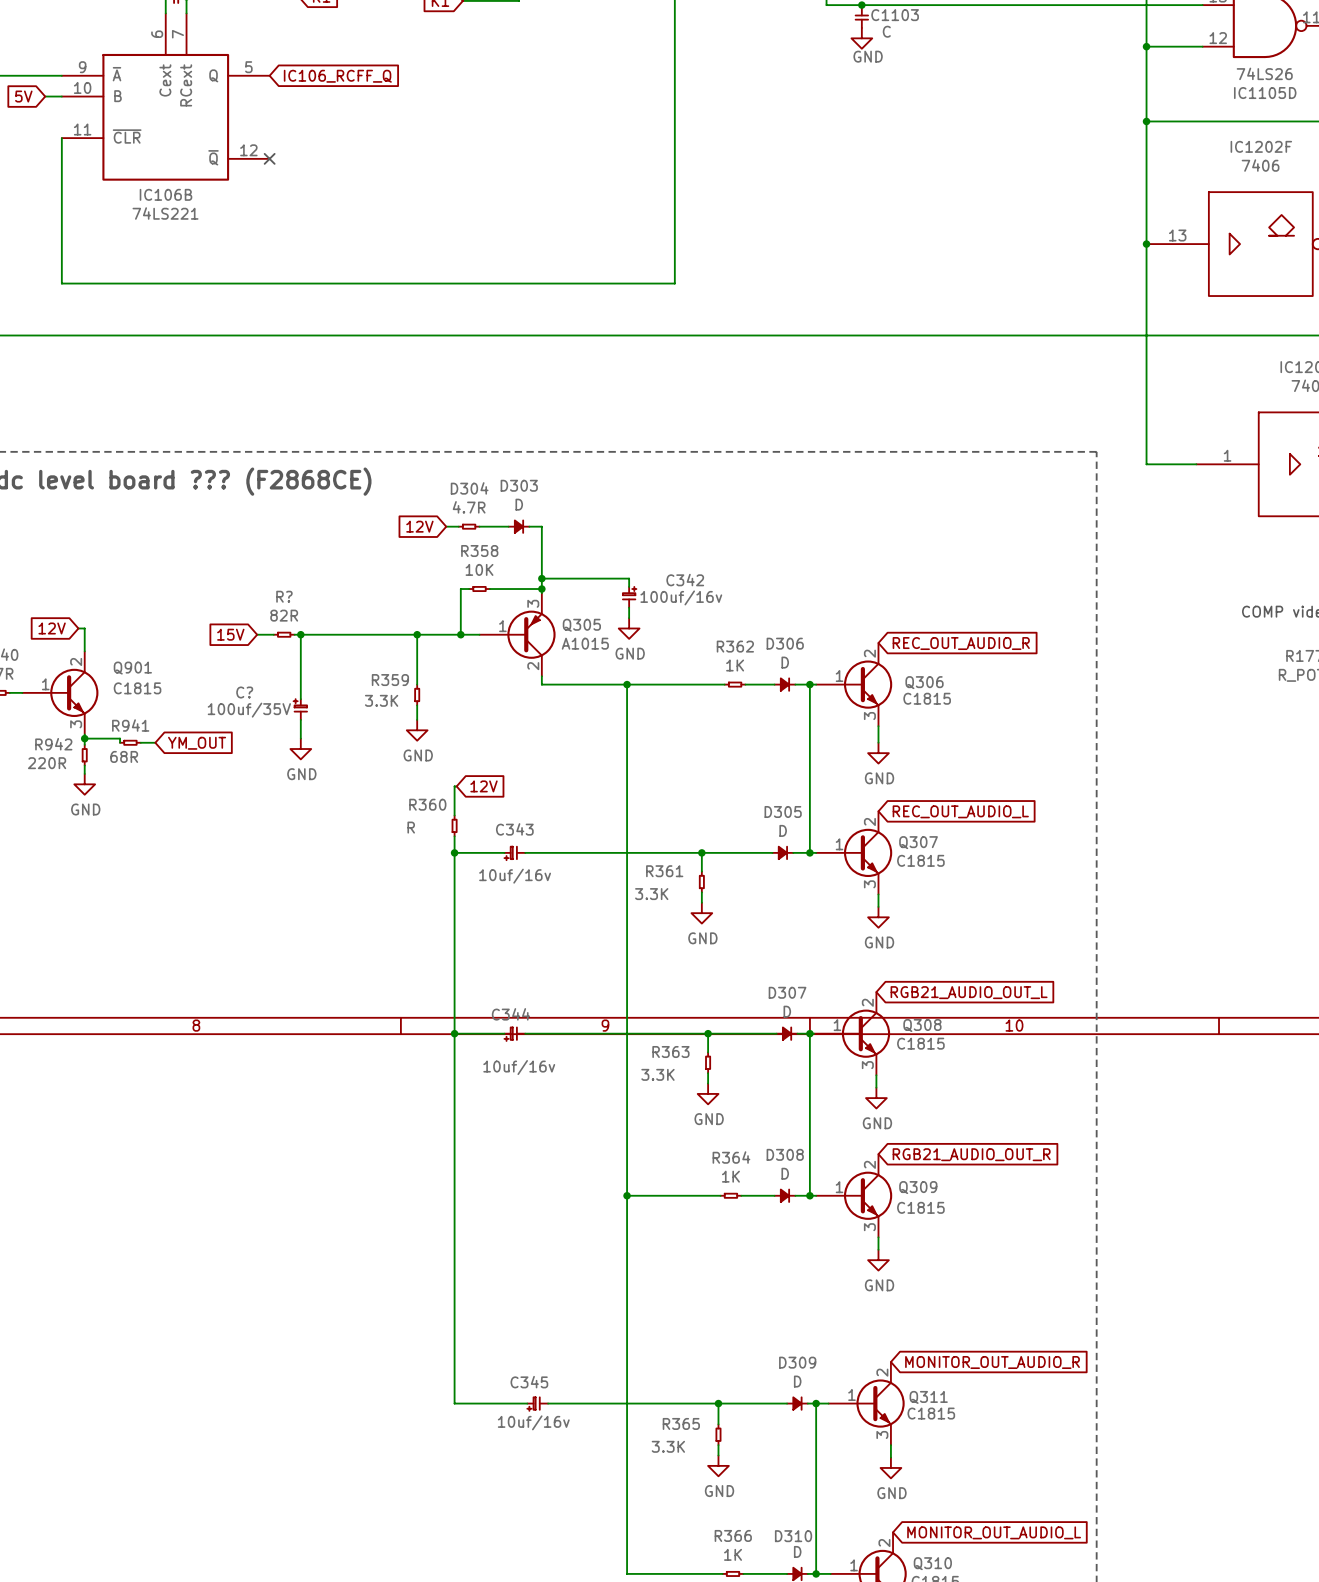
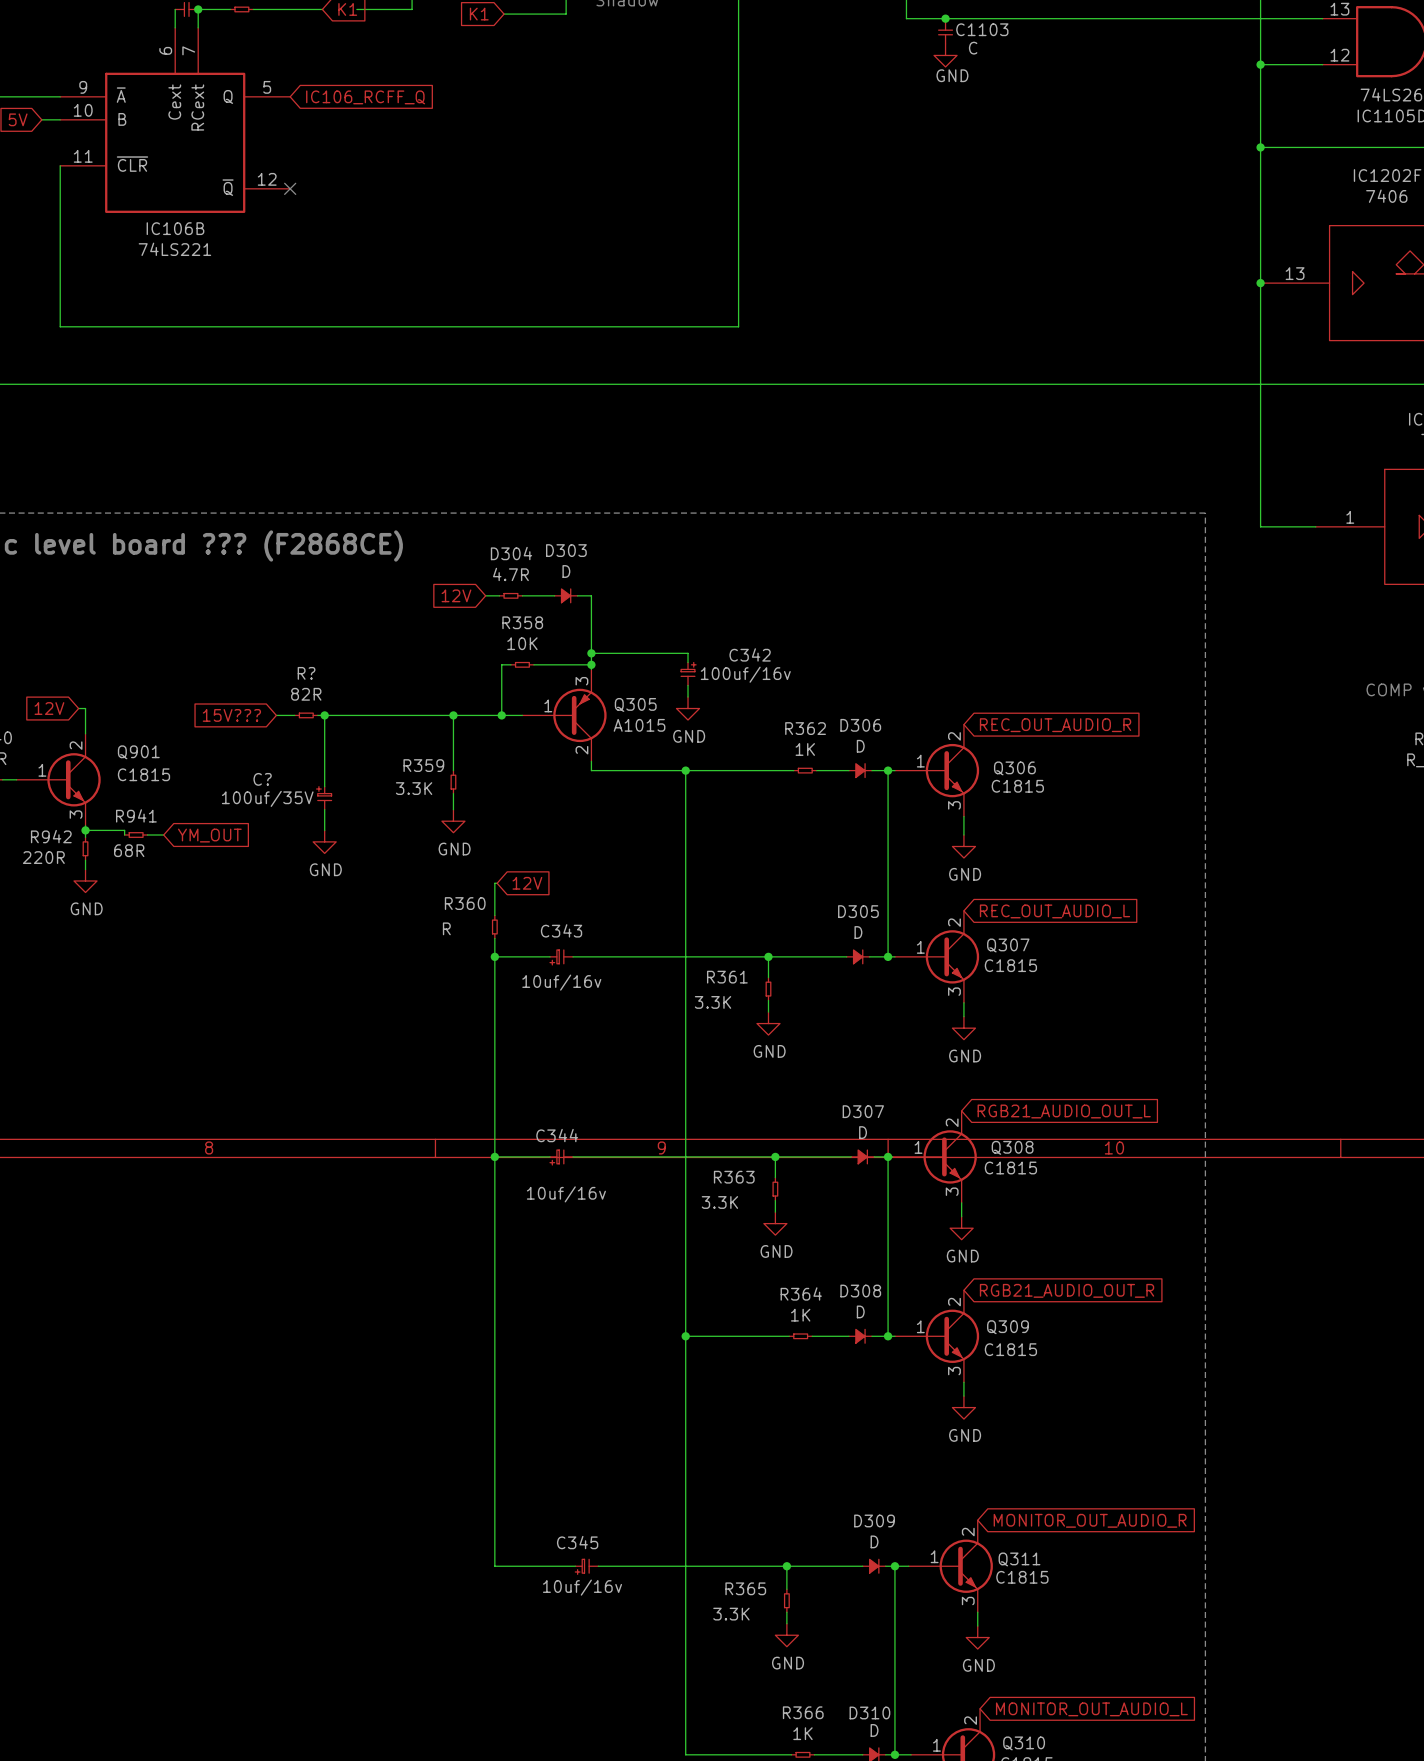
global label: 15V (230, 634) -> 15V??? (231, 715)

